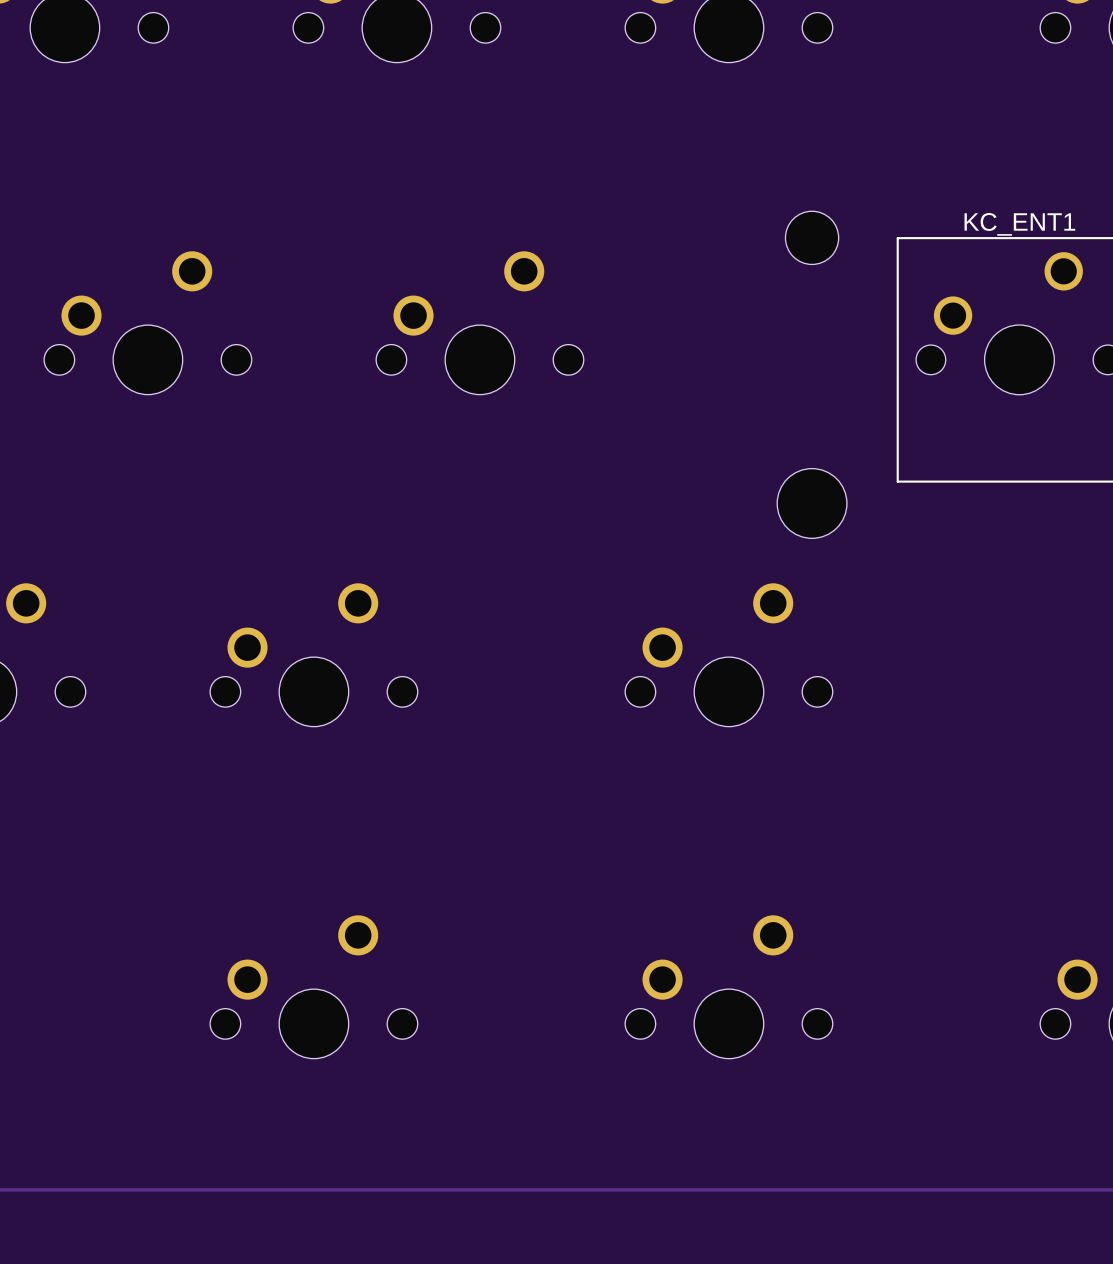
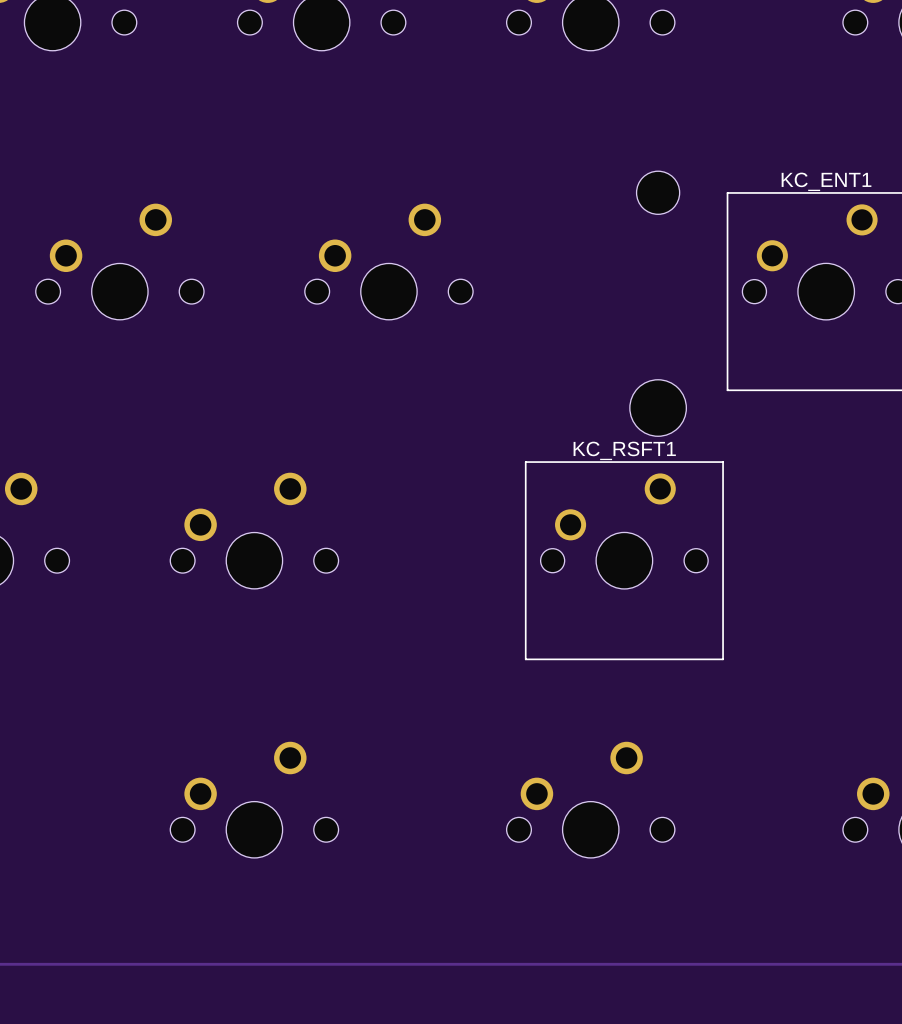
part: (728, 654) -> none
KC_RSFT1: none -> (624, 560)

